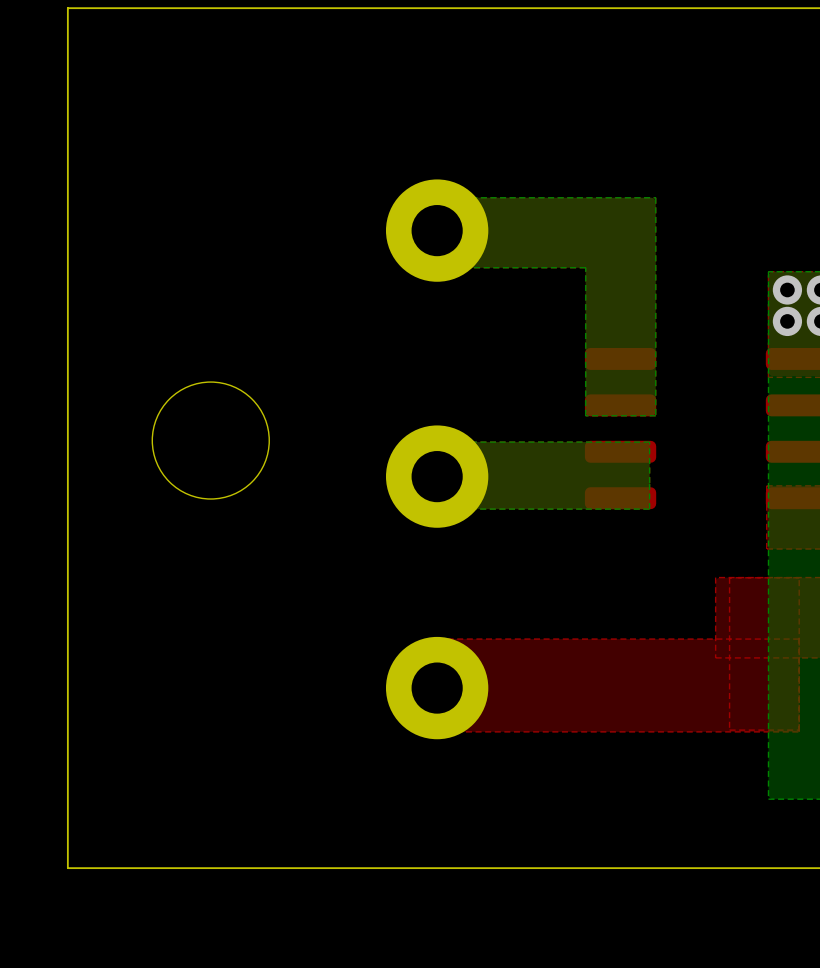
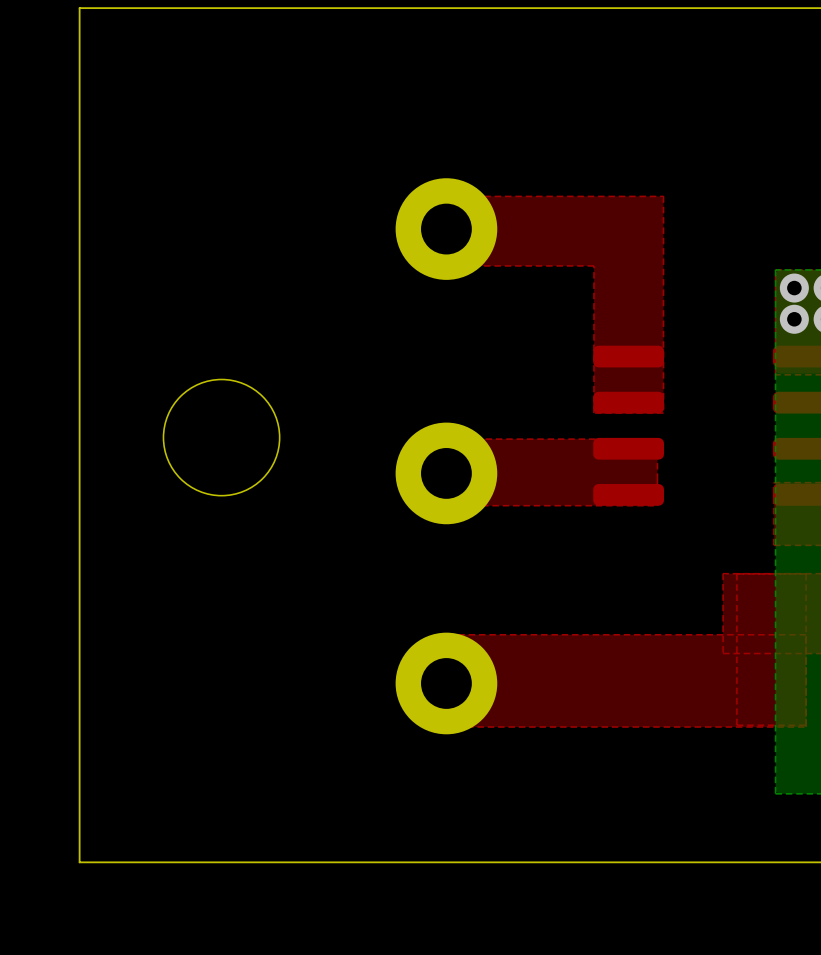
bottom zone outline: (655, 197) (423, 197) (423, 267) (585, 267) (585, 415) (655, 415) (655, 197) -> none
bottom zone outline: (649, 442) (649, 509) (441, 509) (446, 508) (442, 508) (442, 442) (649, 442) -> none

